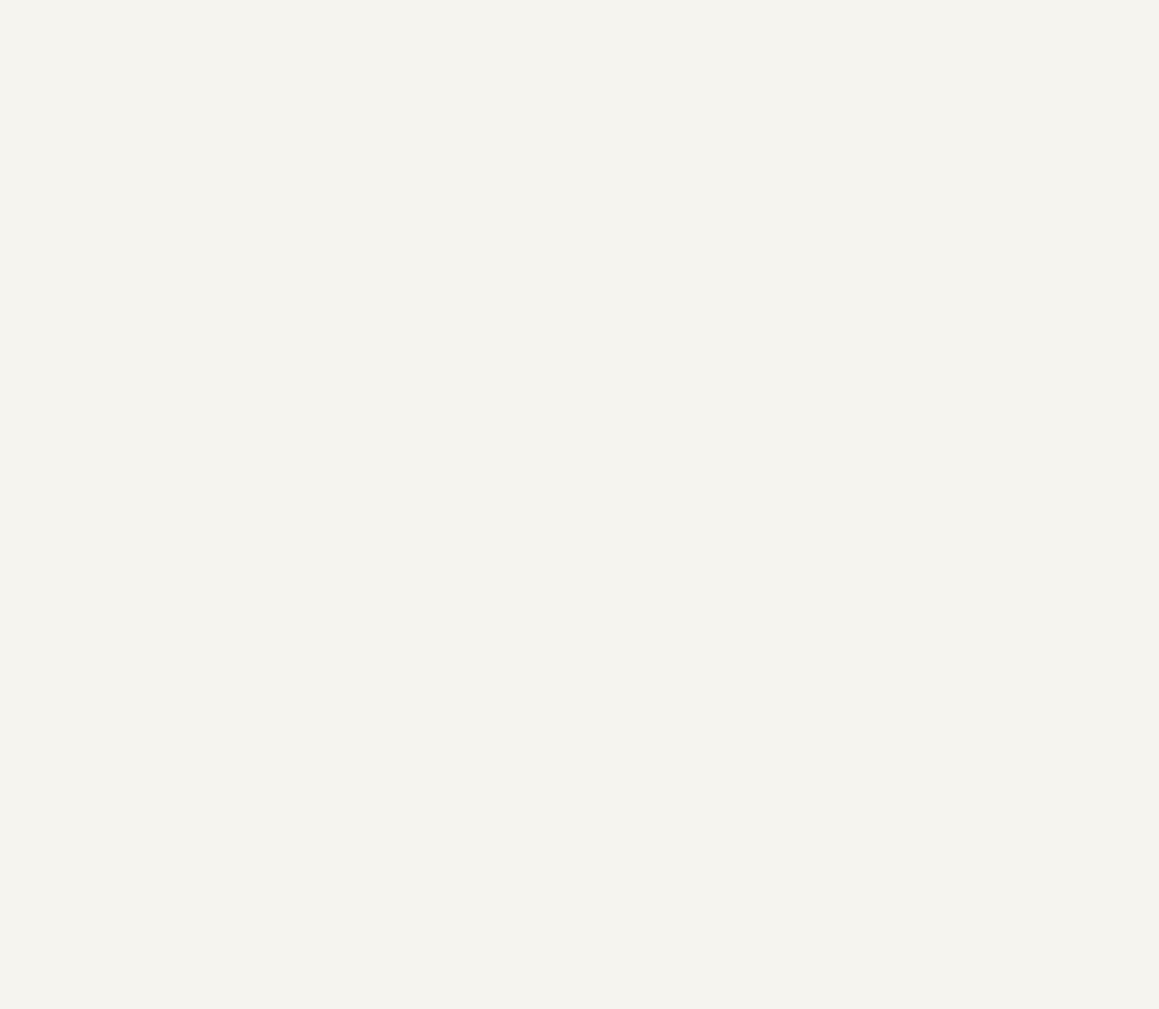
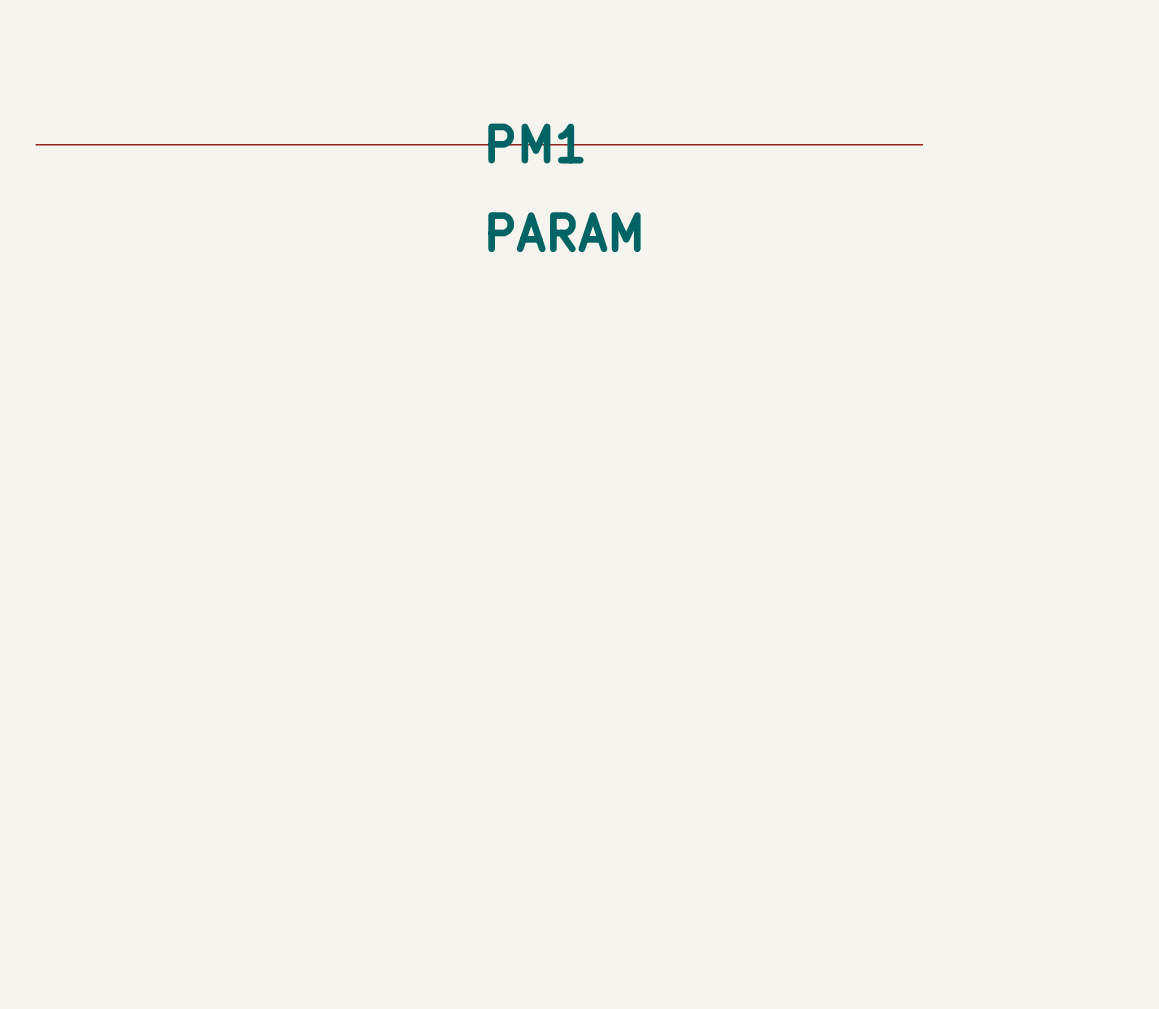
PM1: none -> PARAM (479, 144)

